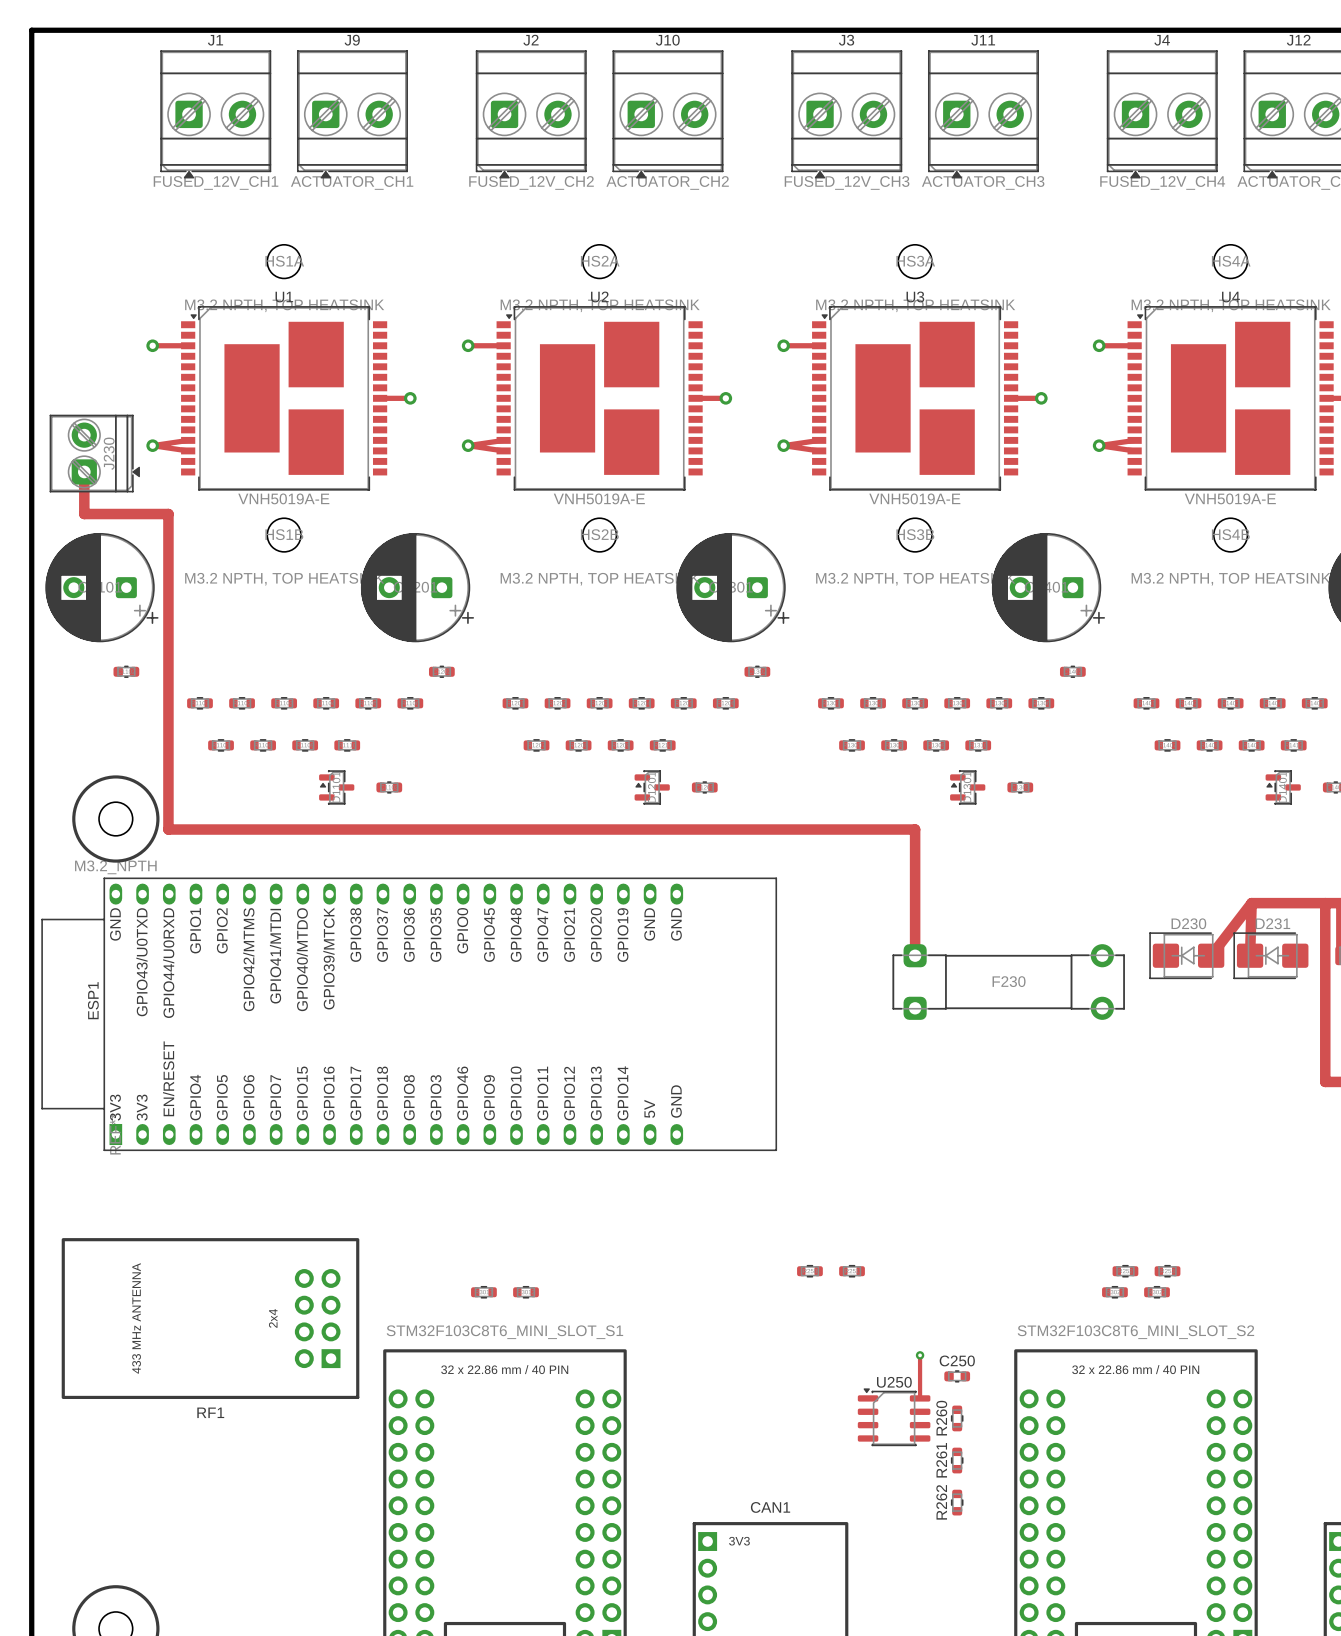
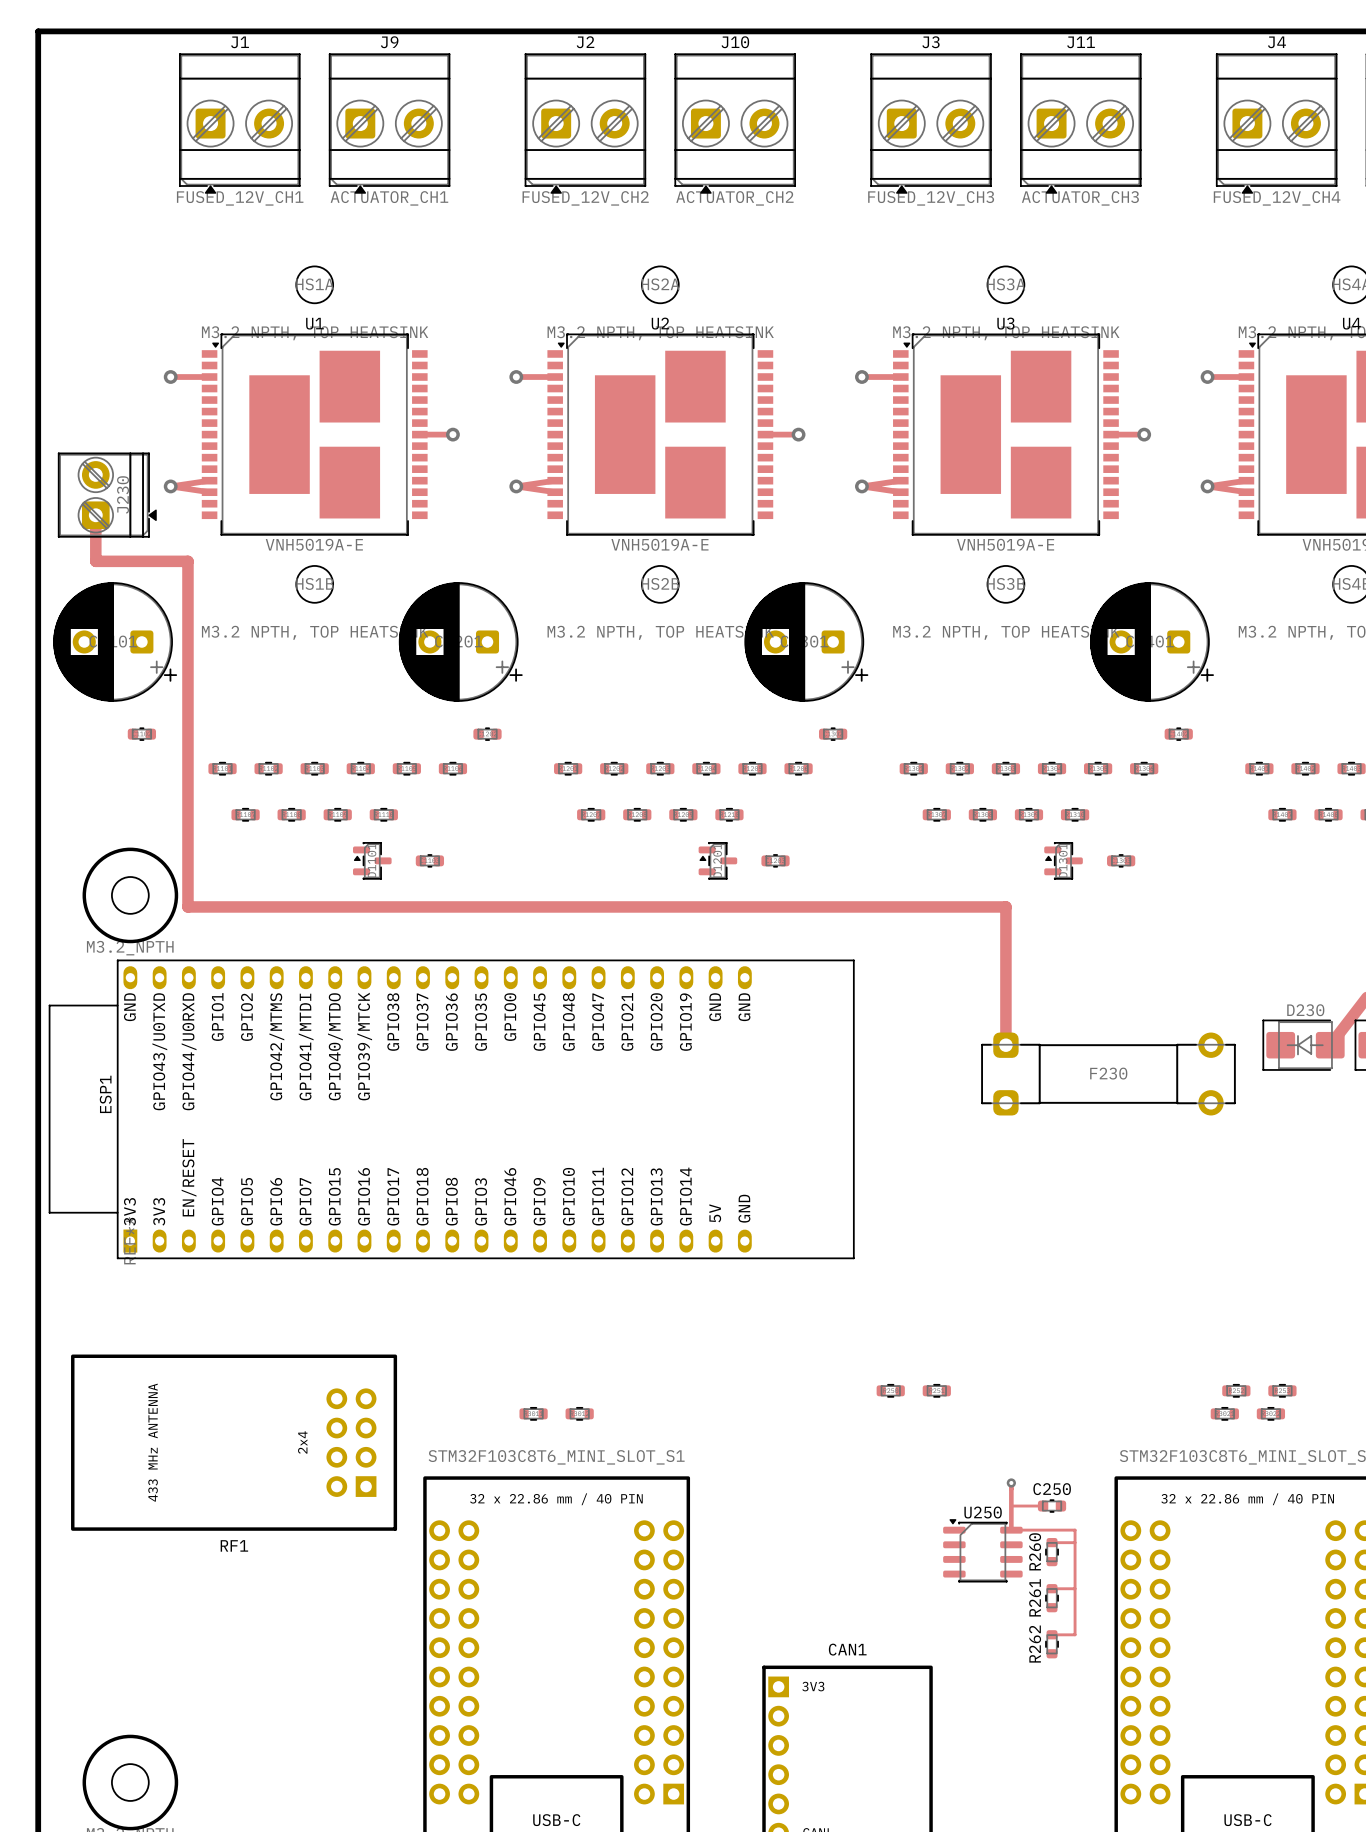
track: none -> (1011, 1506) (1043, 1506)
track: none -> (1011, 1530) (1075, 1530) (1075, 1634) (1052, 1634)
track: none -> (1052, 1542) (1075, 1542)
track: none -> (1052, 1588) (1075, 1588)

